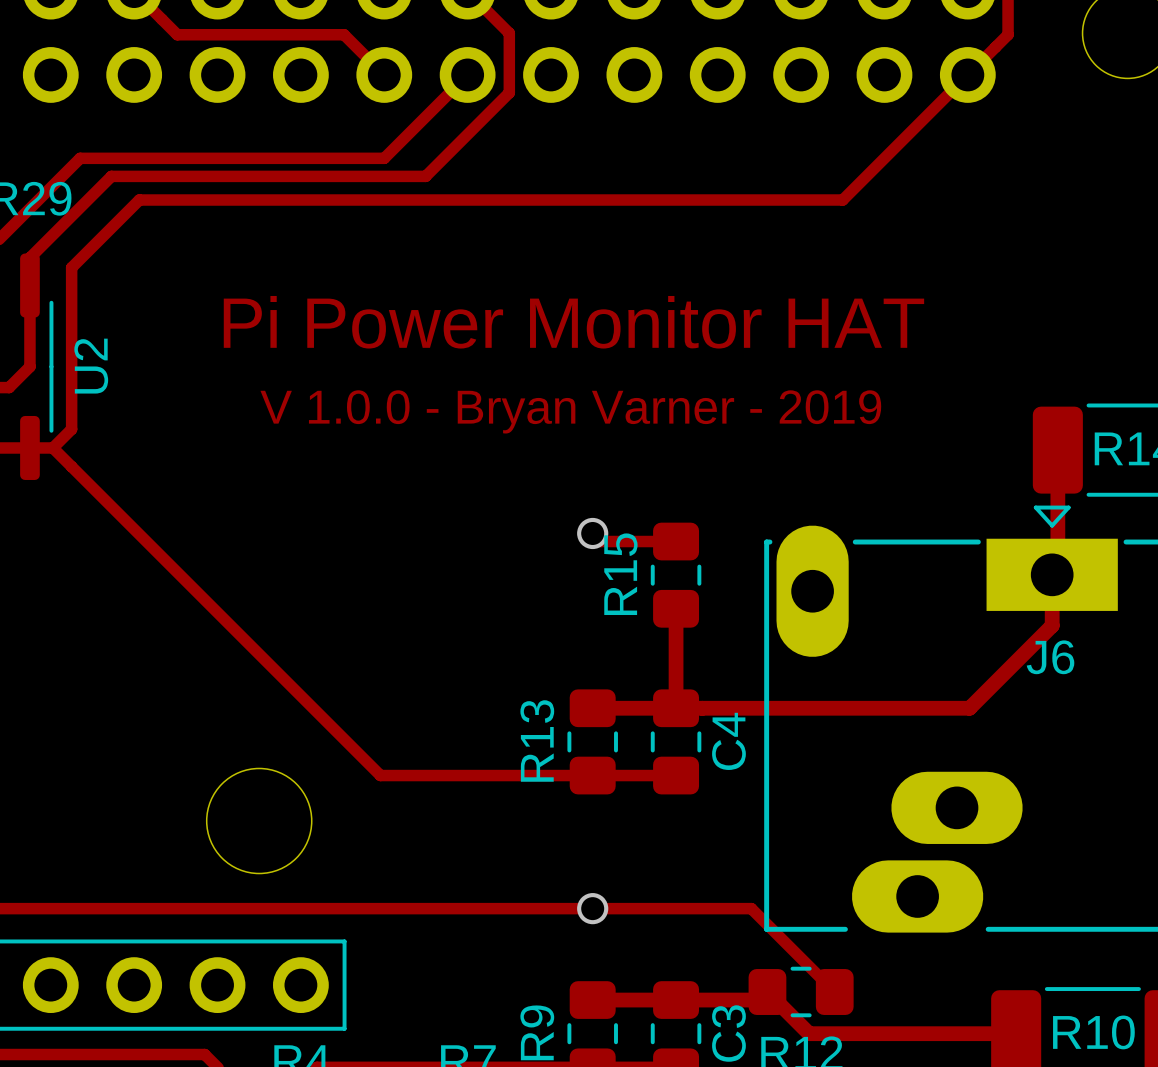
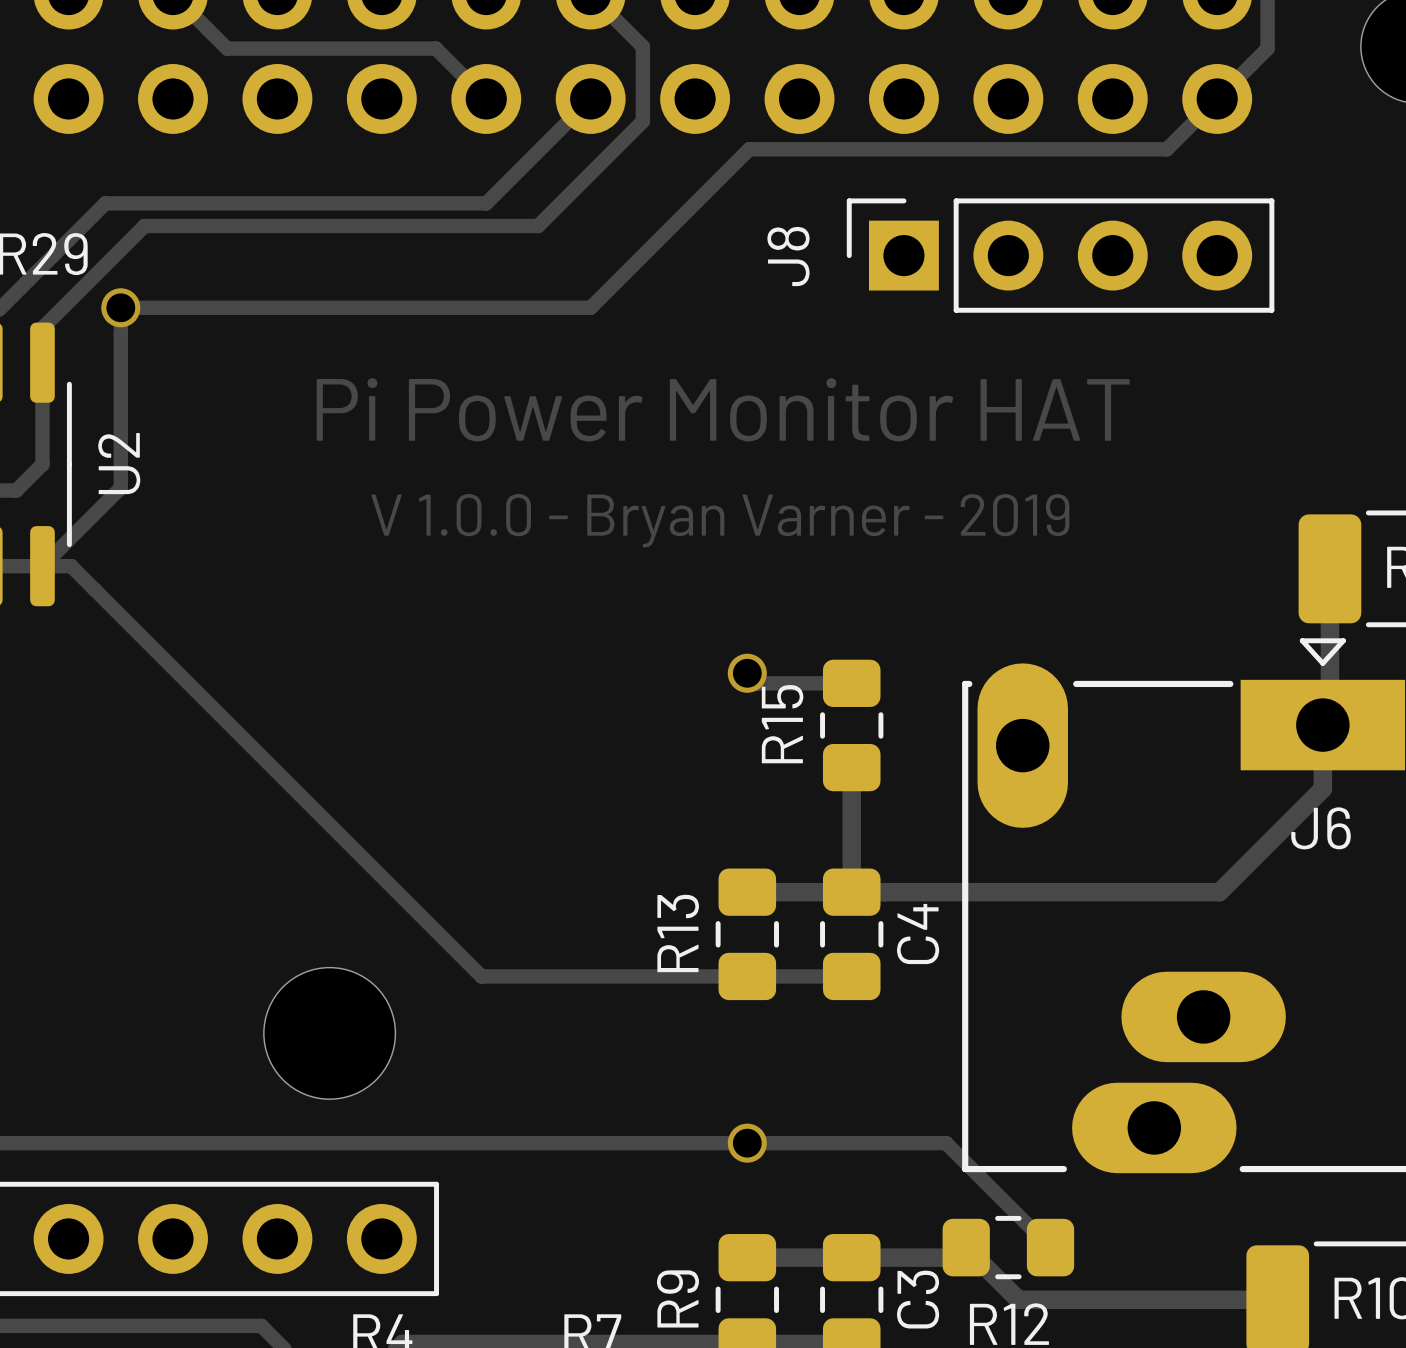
track: (927, 115) (842, 200) (139, 200) (71, 267) (71, 429) (52, 447) -> (1166, 149) (749, 149) (590, 307) (120, 307) (120, 487) (42, 566)
J8: none -> (1060, 255)
via: none -> (120, 307)

